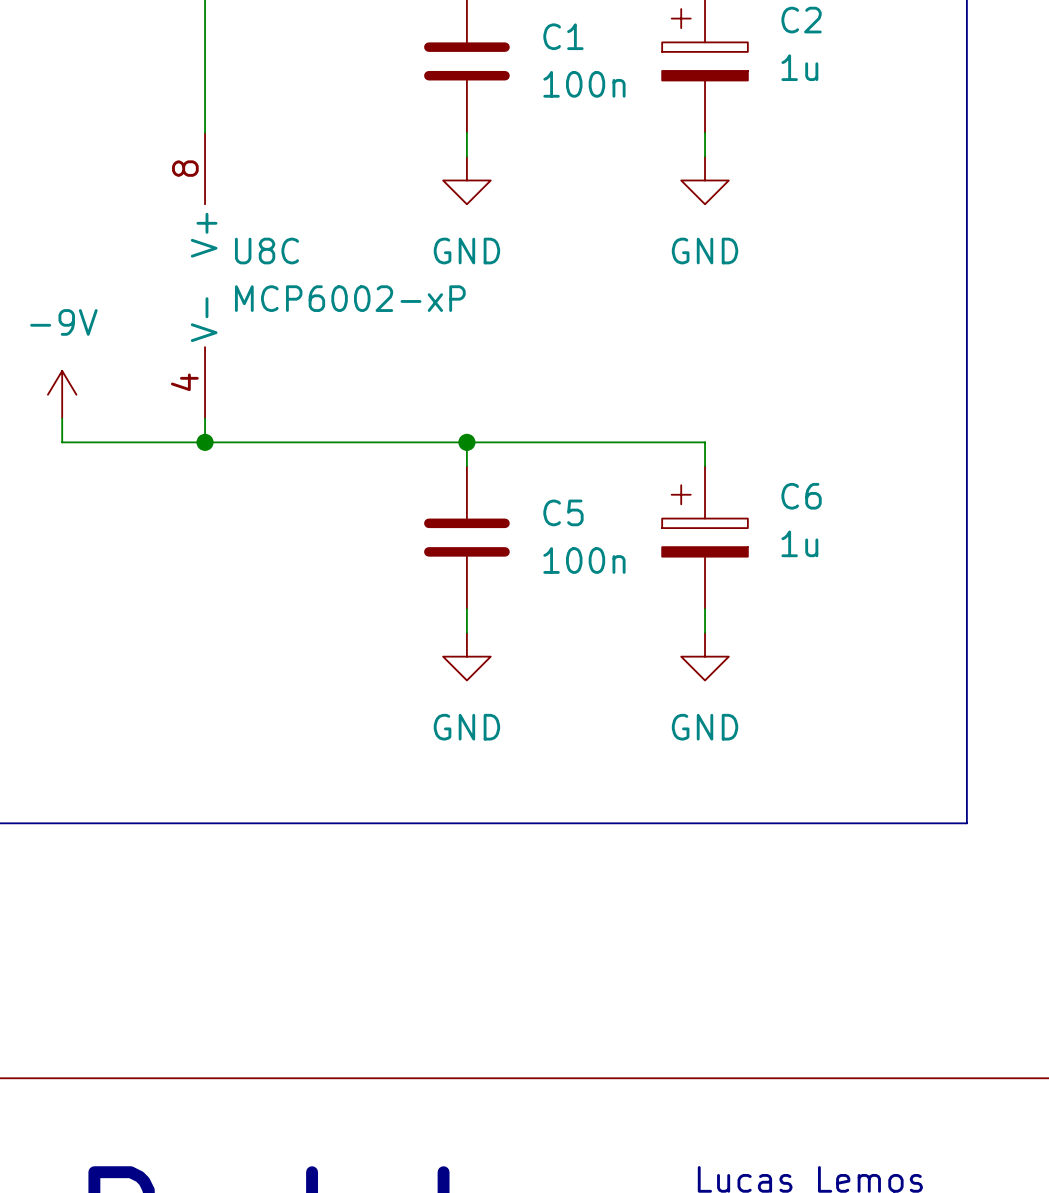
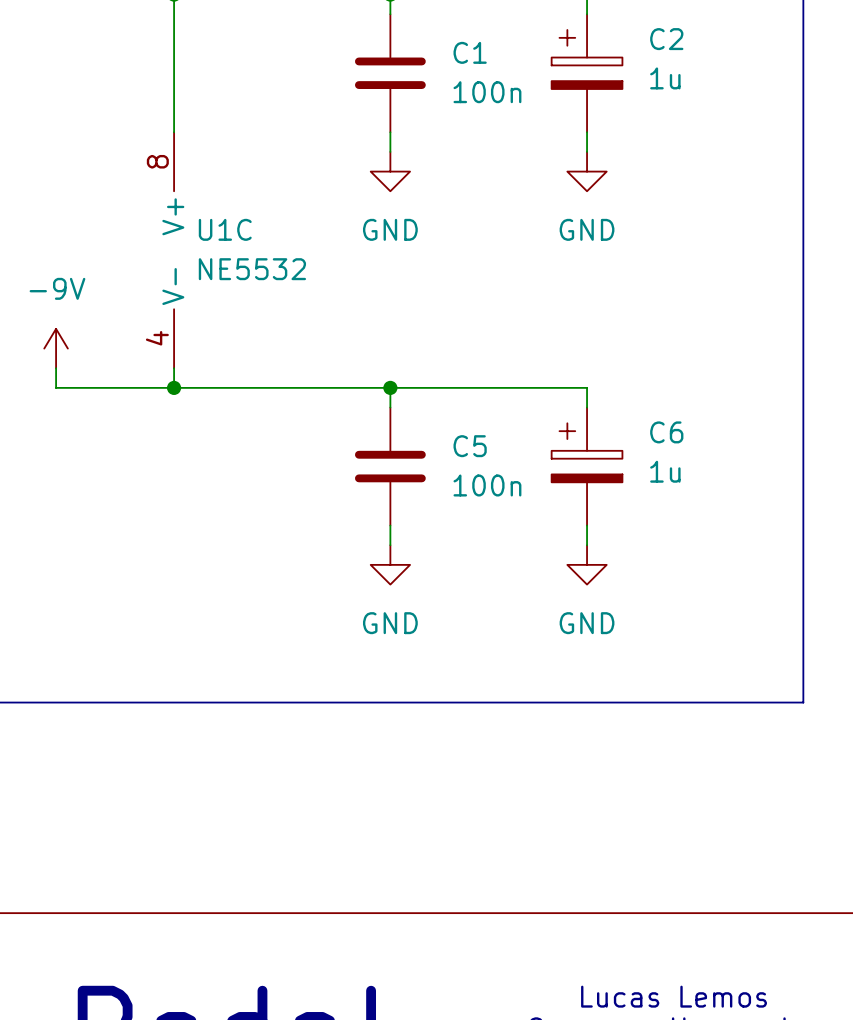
U8C name: U8C (267, 251) -> U1C (225, 229)
U8C value: MCP6002-xP (350, 298) -> NE5532 (252, 269)

